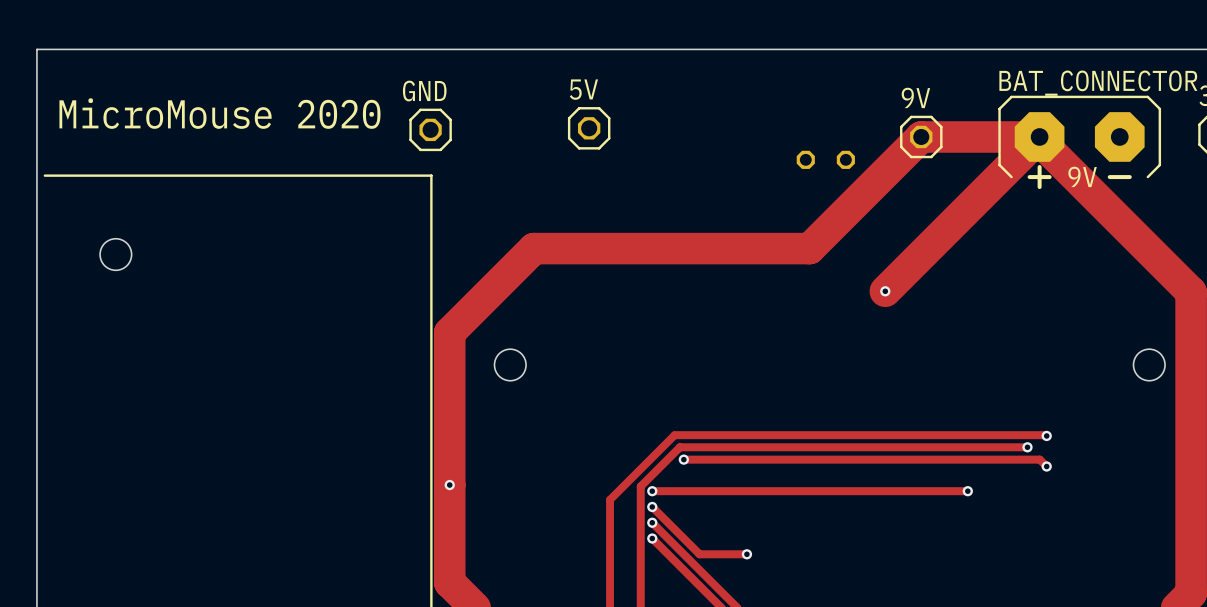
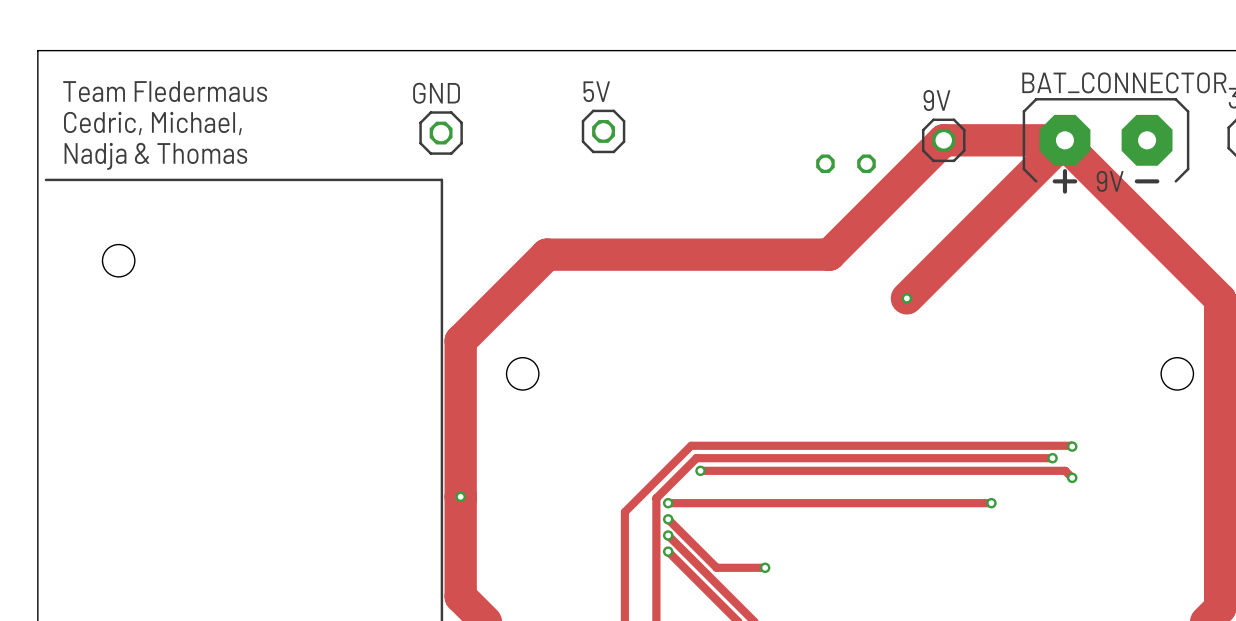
text: none -> Team Fledermaus (165, 91)
text: MicroMouse 2020 (219, 113) -> Cedric, Michael, (152, 123)
text: none -> Nadja & Thomas (155, 156)

